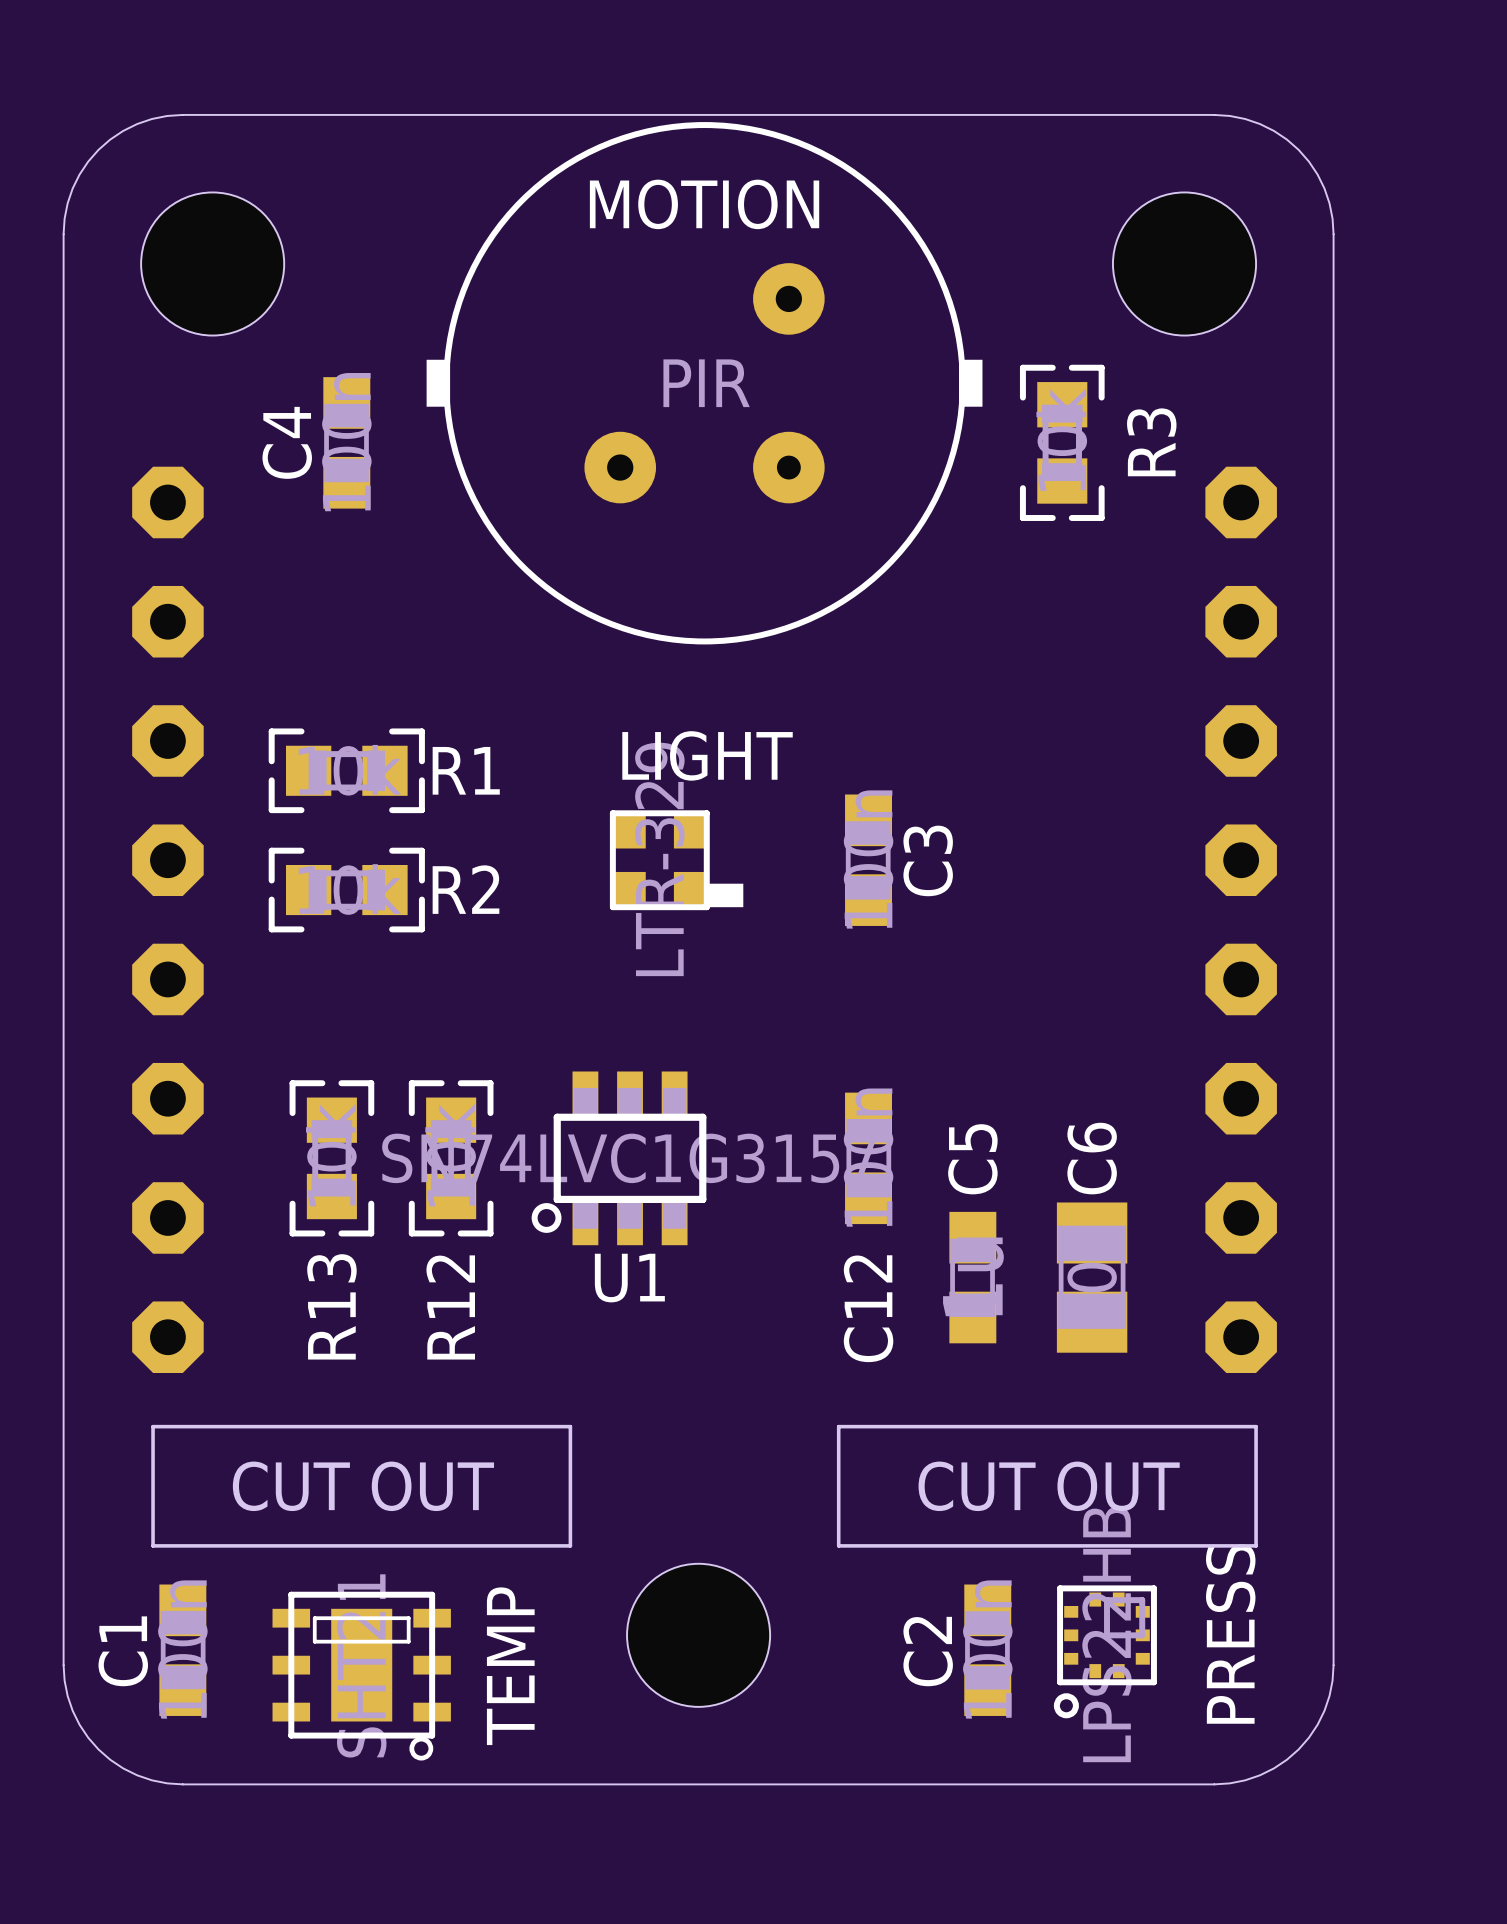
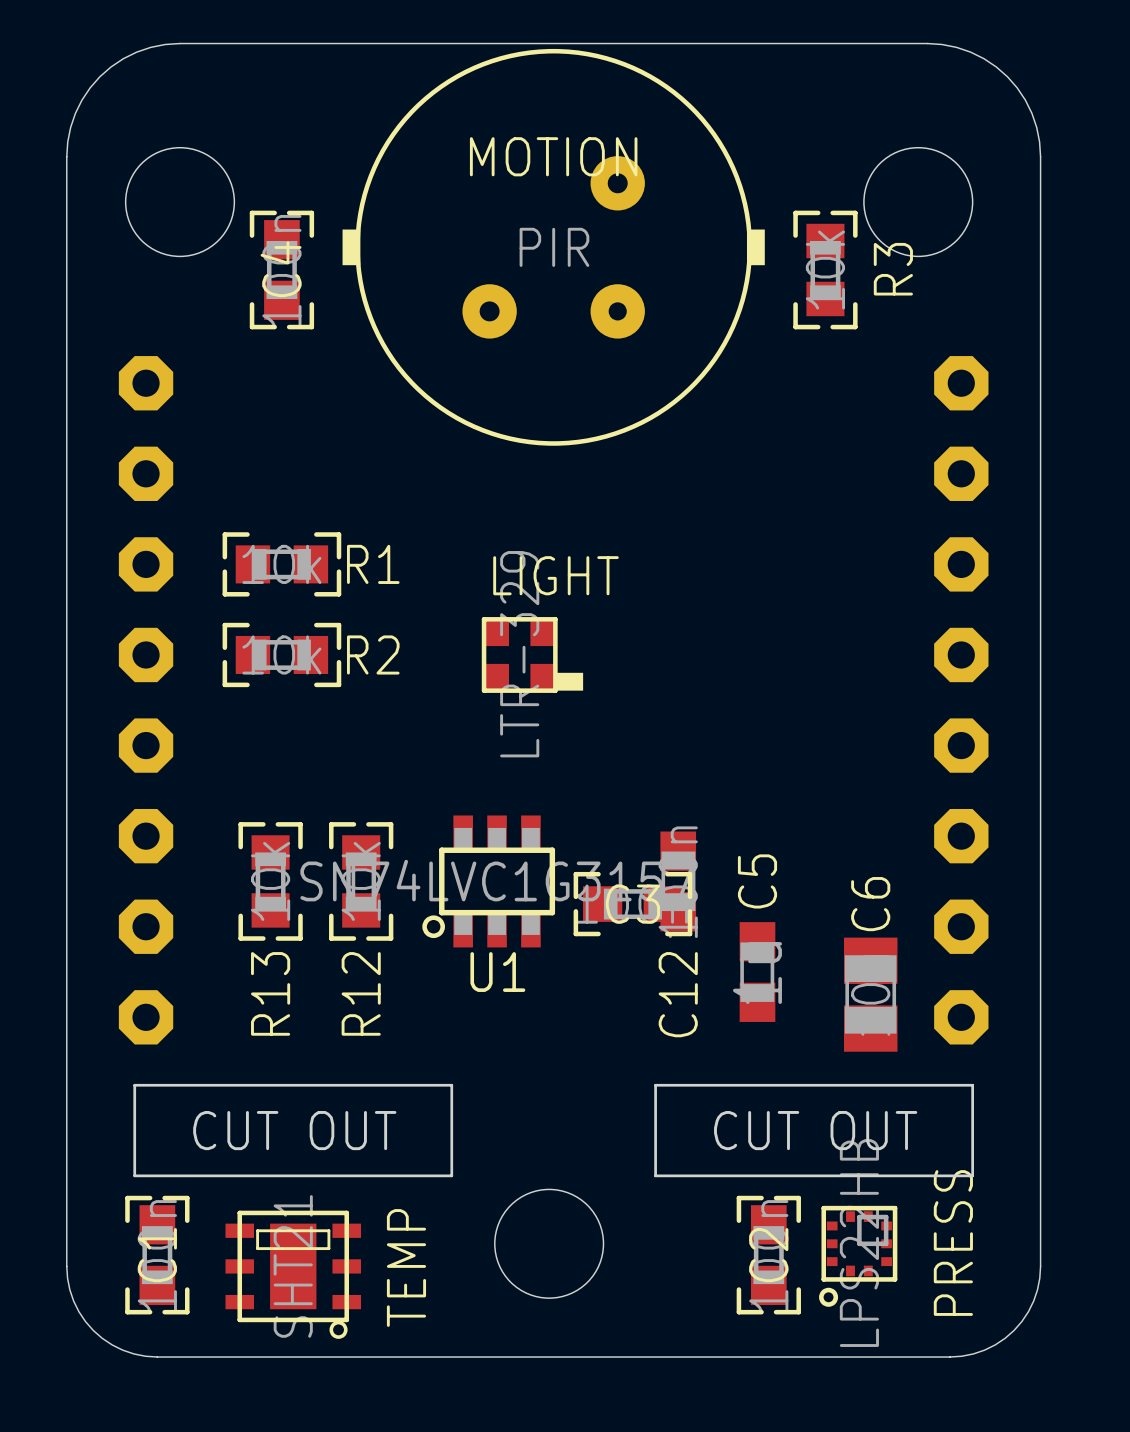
board edge: (63, 234) (67, 203) (72, 188) (88, 161) (98, 149) (110, 139) (137, 124) (151, 119) (182, 114) (1214, 114) (1245, 119) (1259, 124) (1286, 139) (1308, 161) (1324, 188) (1329, 203) (1333, 234) (1333, 1665) (1329, 1696) (1324, 1710) (1308, 1737) (1298, 1749) (1286, 1759) (1259, 1775) (1245, 1780) (1214, 1784) -> (66, 179) (67, 141) (70, 127) (81, 100) (90, 87) (99, 76) (123, 58) (150, 47) (165, 44) (927, 43) (956, 47) (970, 52) (996, 66) (1017, 87) (1025, 100) (1036, 127) (1040, 156) (1040, 1266) (1037, 1289) (1033, 1301) (1021, 1321) (1014, 1330) (1005, 1338) (984, 1350) (961, 1356) (940, 1357)
C4 footprint: [323, 377, 371, 509] -> [249, 210, 315, 330]
MOTION position: (704, 383) -> (553, 247)
R3 position: (1062, 442) -> (825, 270)
R1 position: (346, 770) -> (281, 564)
C3 footprint: [845, 794, 892, 926] -> [573, 871, 693, 937]
R2 position: (346, 890) -> (281, 654)
C6 position: (1092, 1277) -> (870, 994)
C1 footprint: [159, 1584, 207, 1716] -> [125, 1195, 190, 1315]
C2 footprint: [964, 1584, 1012, 1716] -> [736, 1195, 801, 1315]

